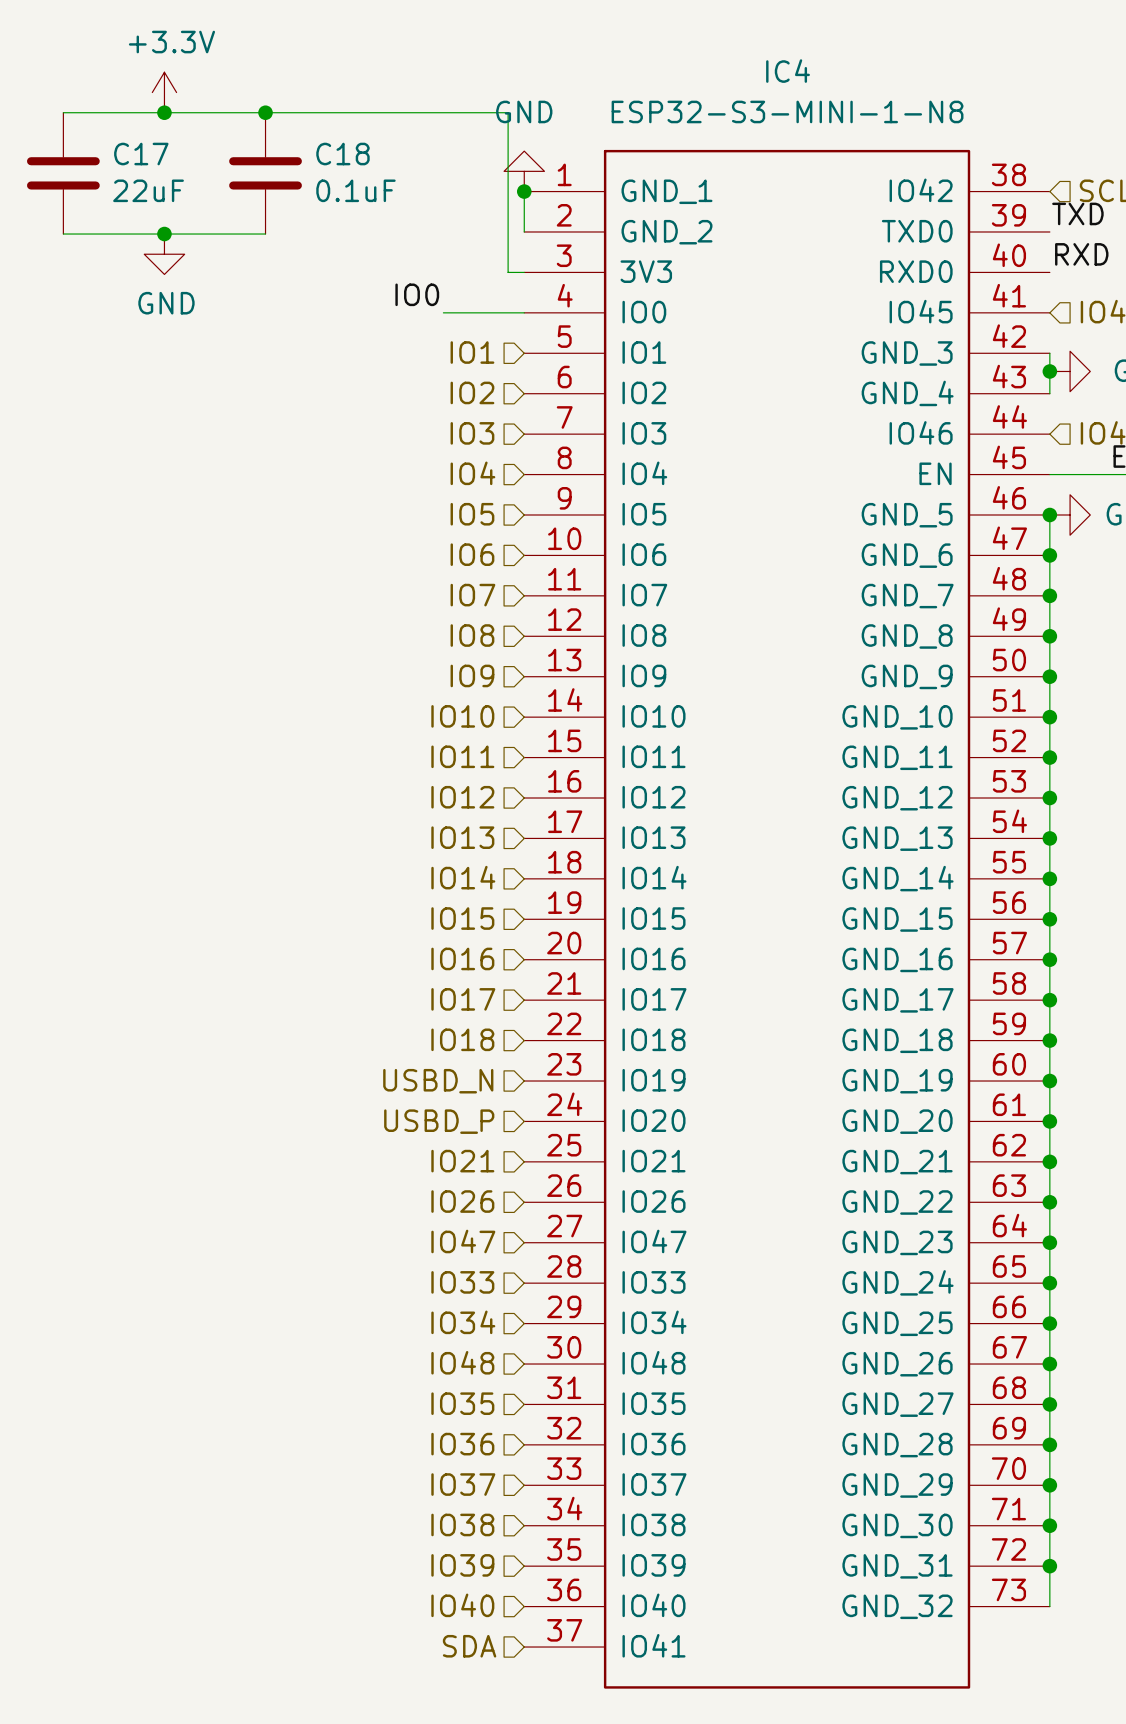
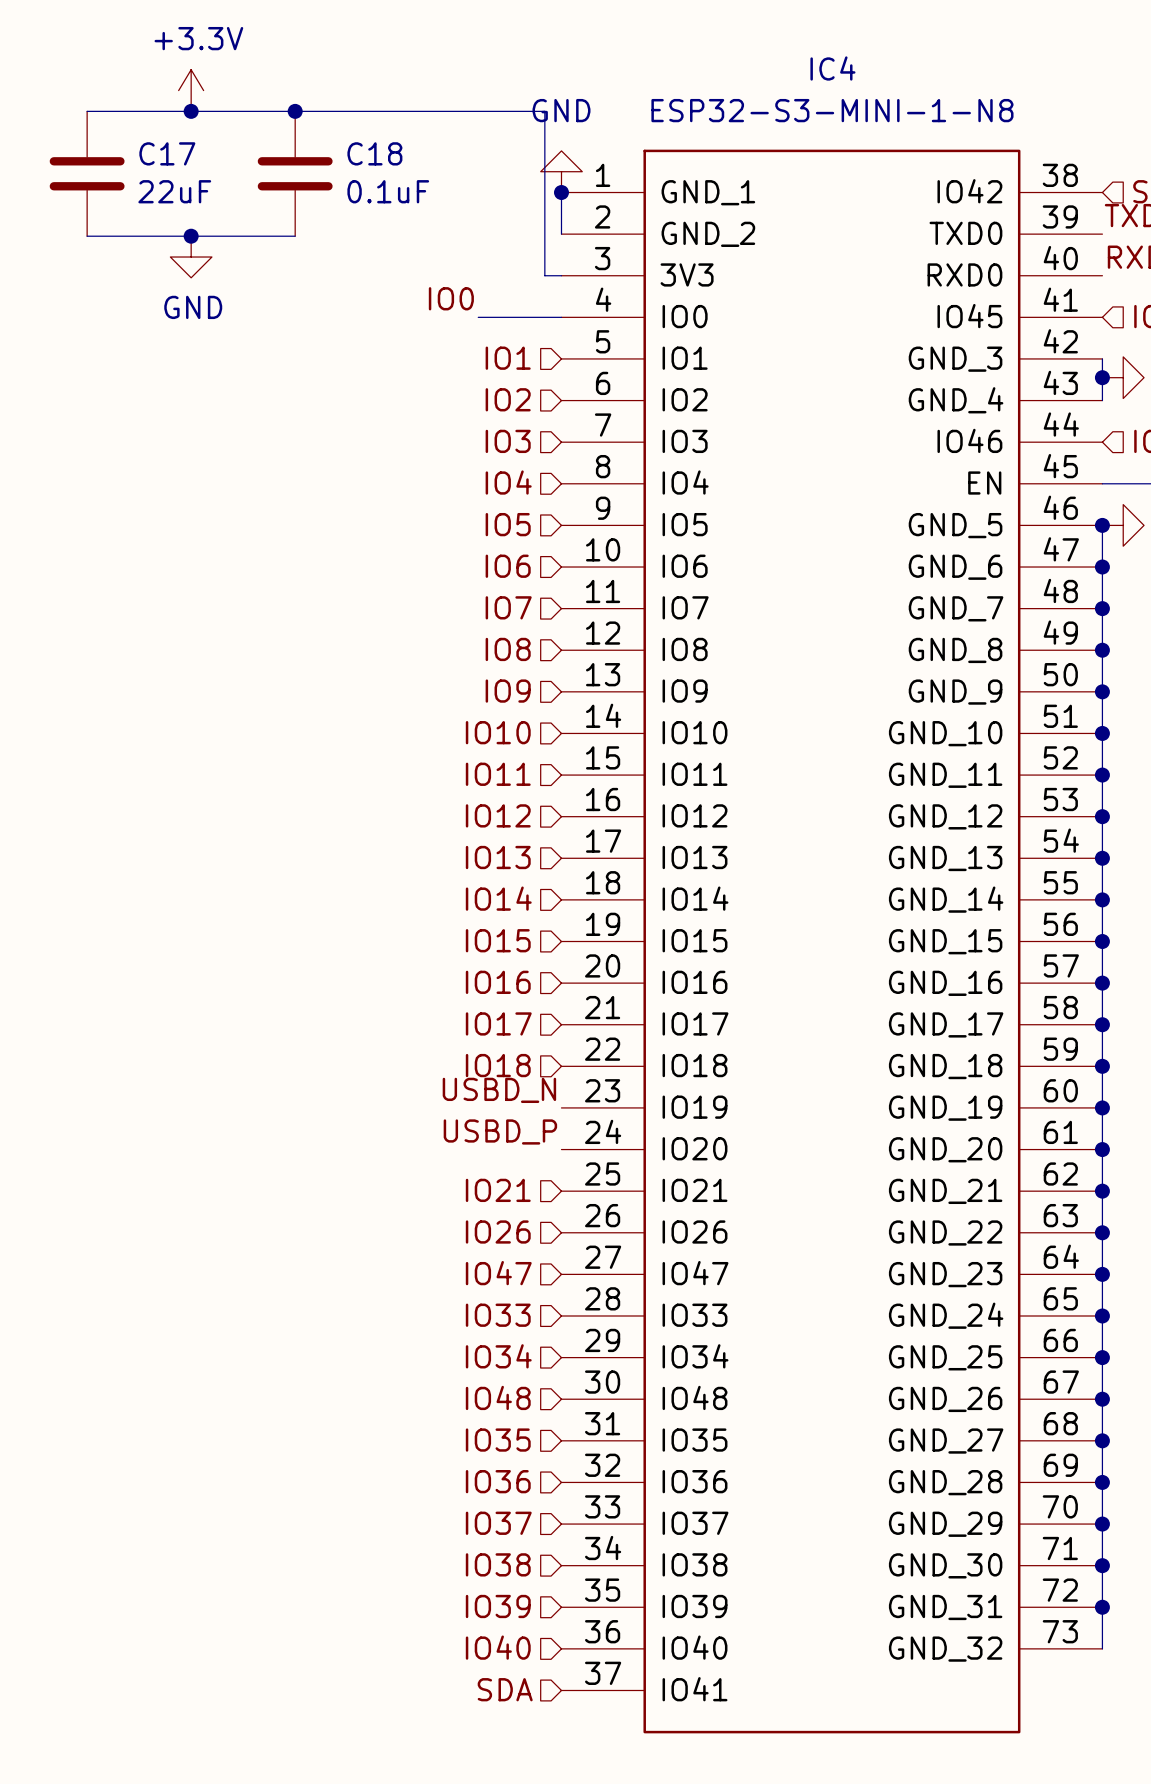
label: none -> USBD_N (499, 1090)
hierarchical label: USBD_N (438, 1081) -> none
label: none -> USBD_P (500, 1131)
hierarchical label: USBD_P (439, 1121) -> none

